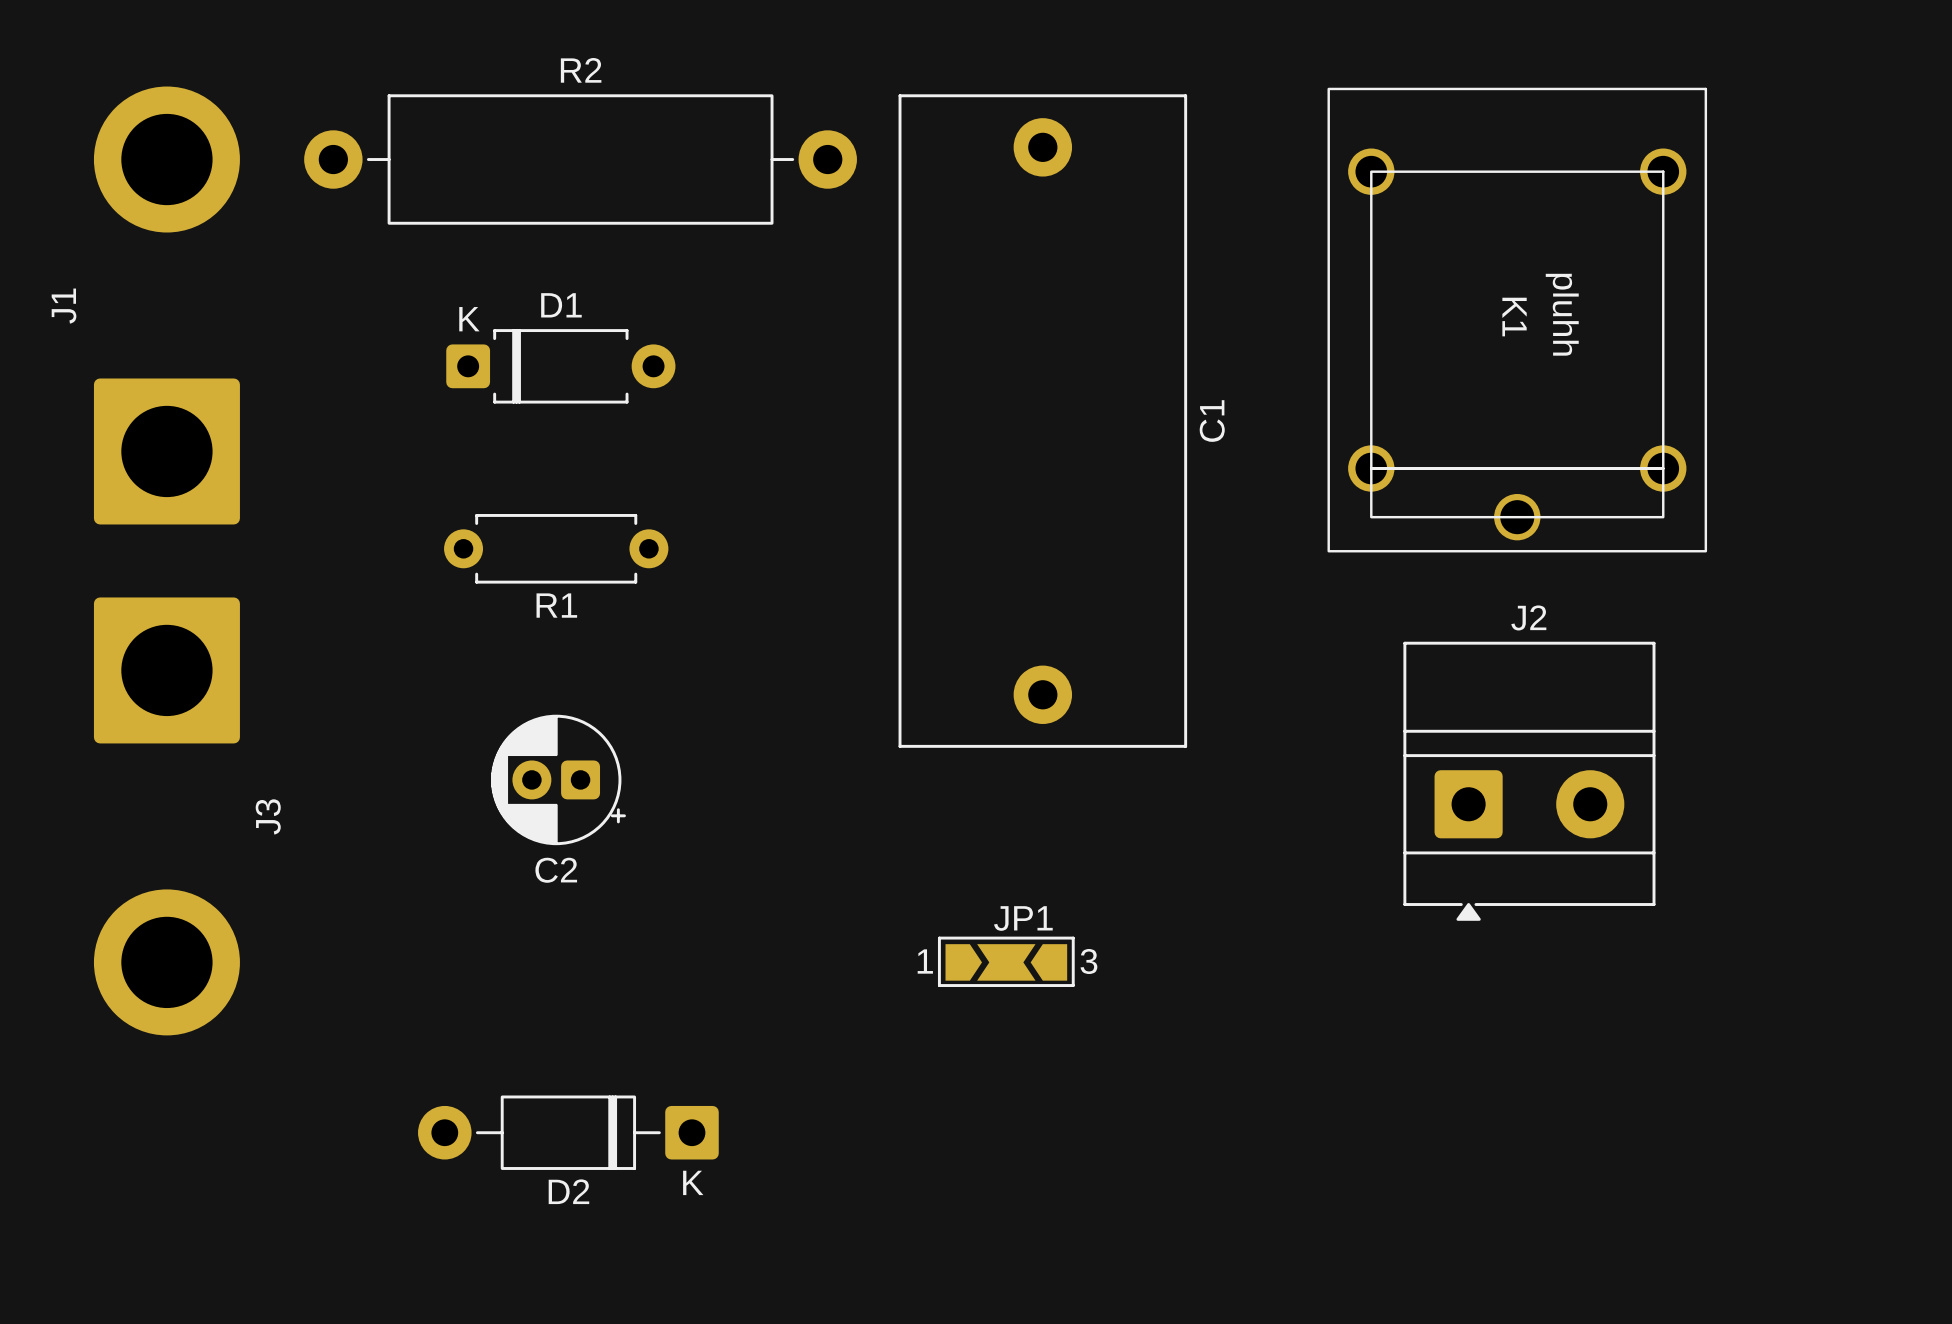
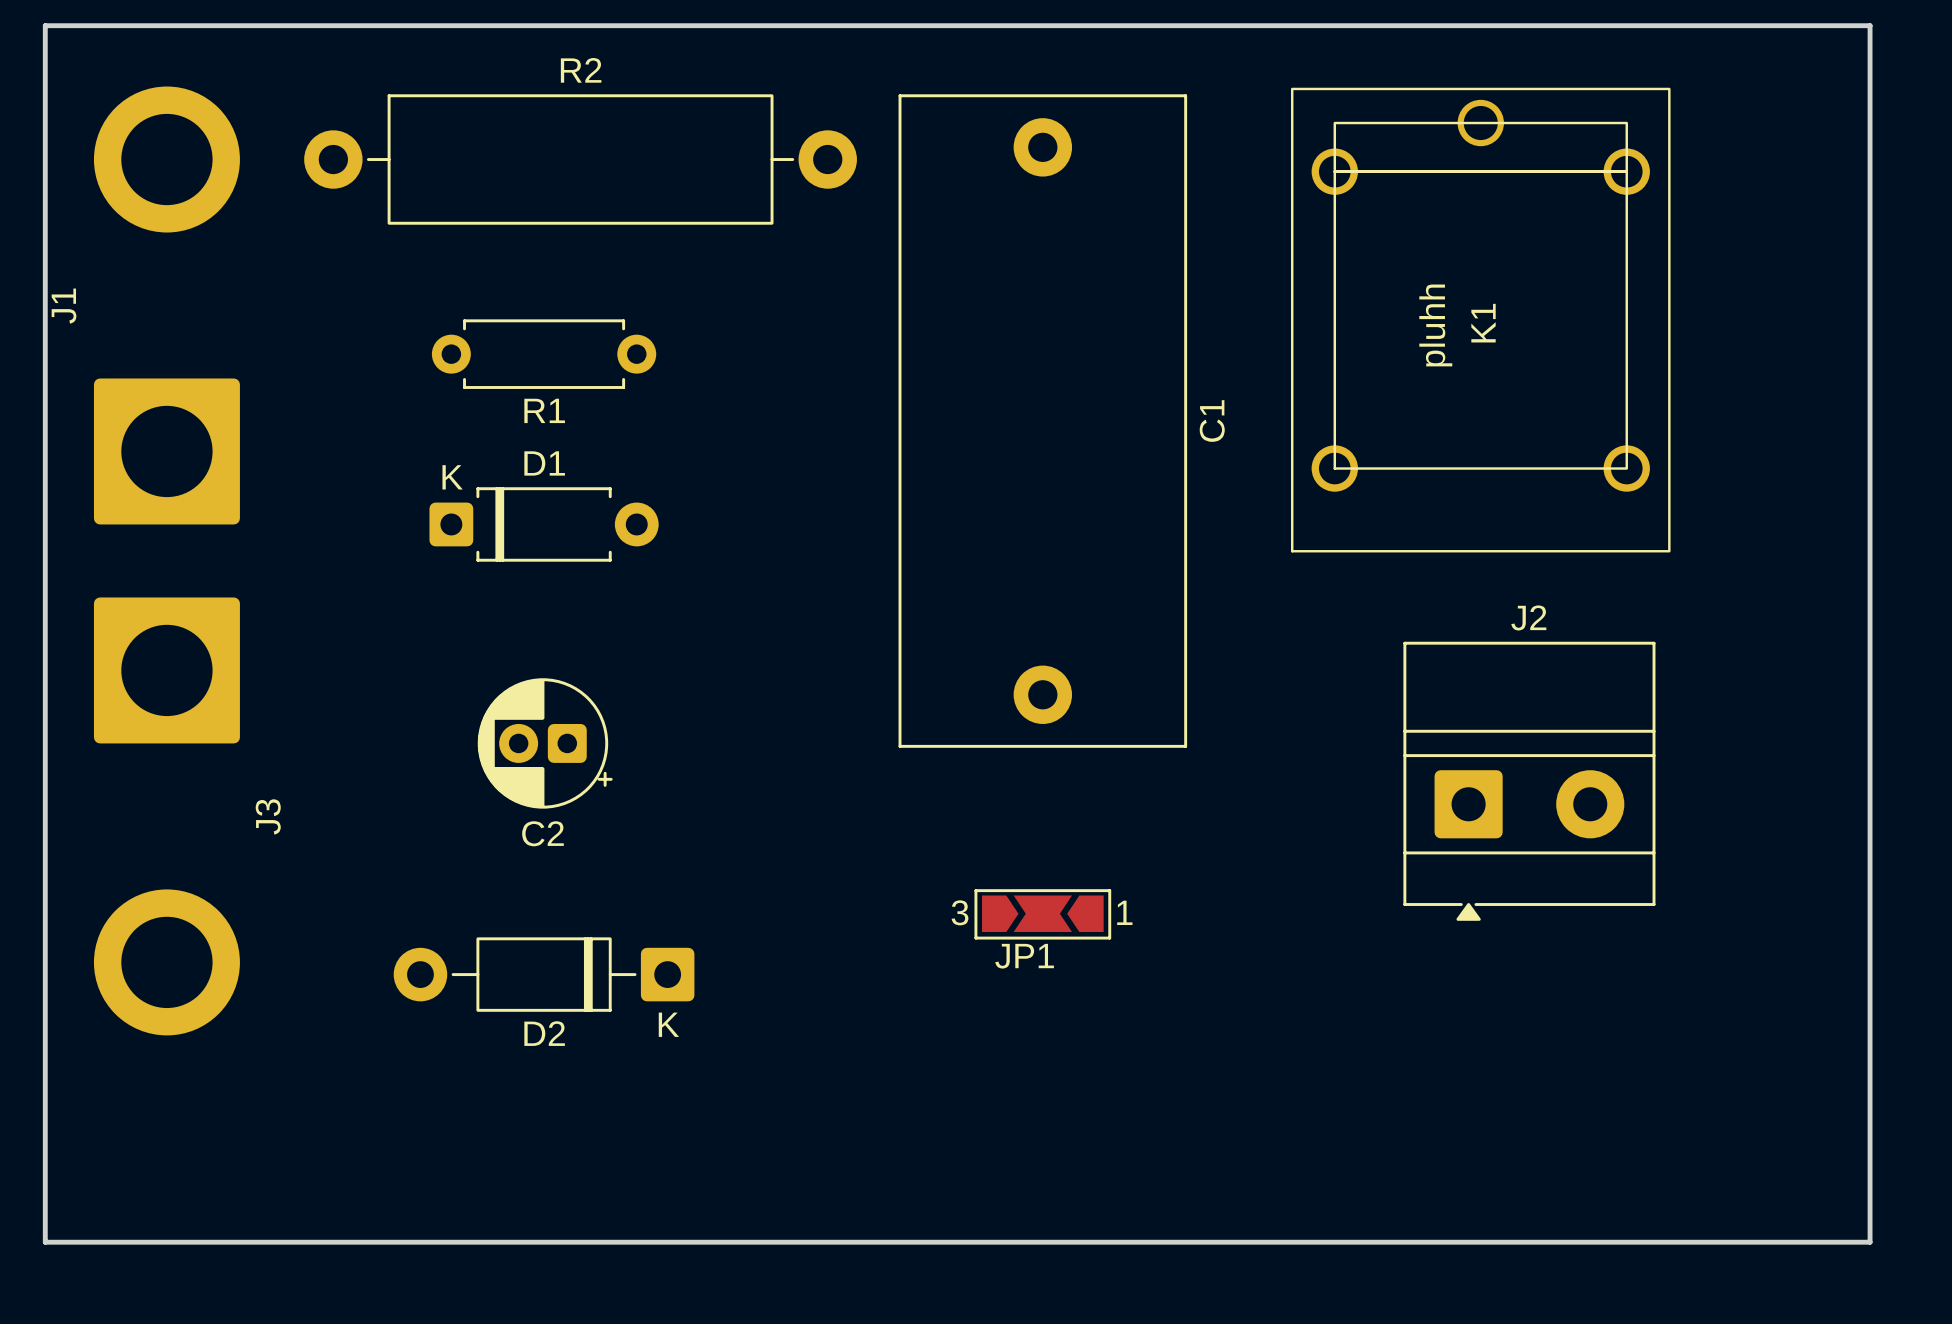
board edge: none -> (45, 25) (1870, 25) (1870, 1242) (45, 1242) (45, 25)
K1 rotation: 0° (1517, 320) -> 180° (1480, 320)
D1 position: (560, 366) -> (544, 524)
R1 position: (556, 548) -> (544, 354)
C2 position: (558, 779) -> (545, 743)
JP1 rotation: 0° (1006, 961) -> 180° (1042, 914)
D2 position: (568, 1132) -> (544, 974)

